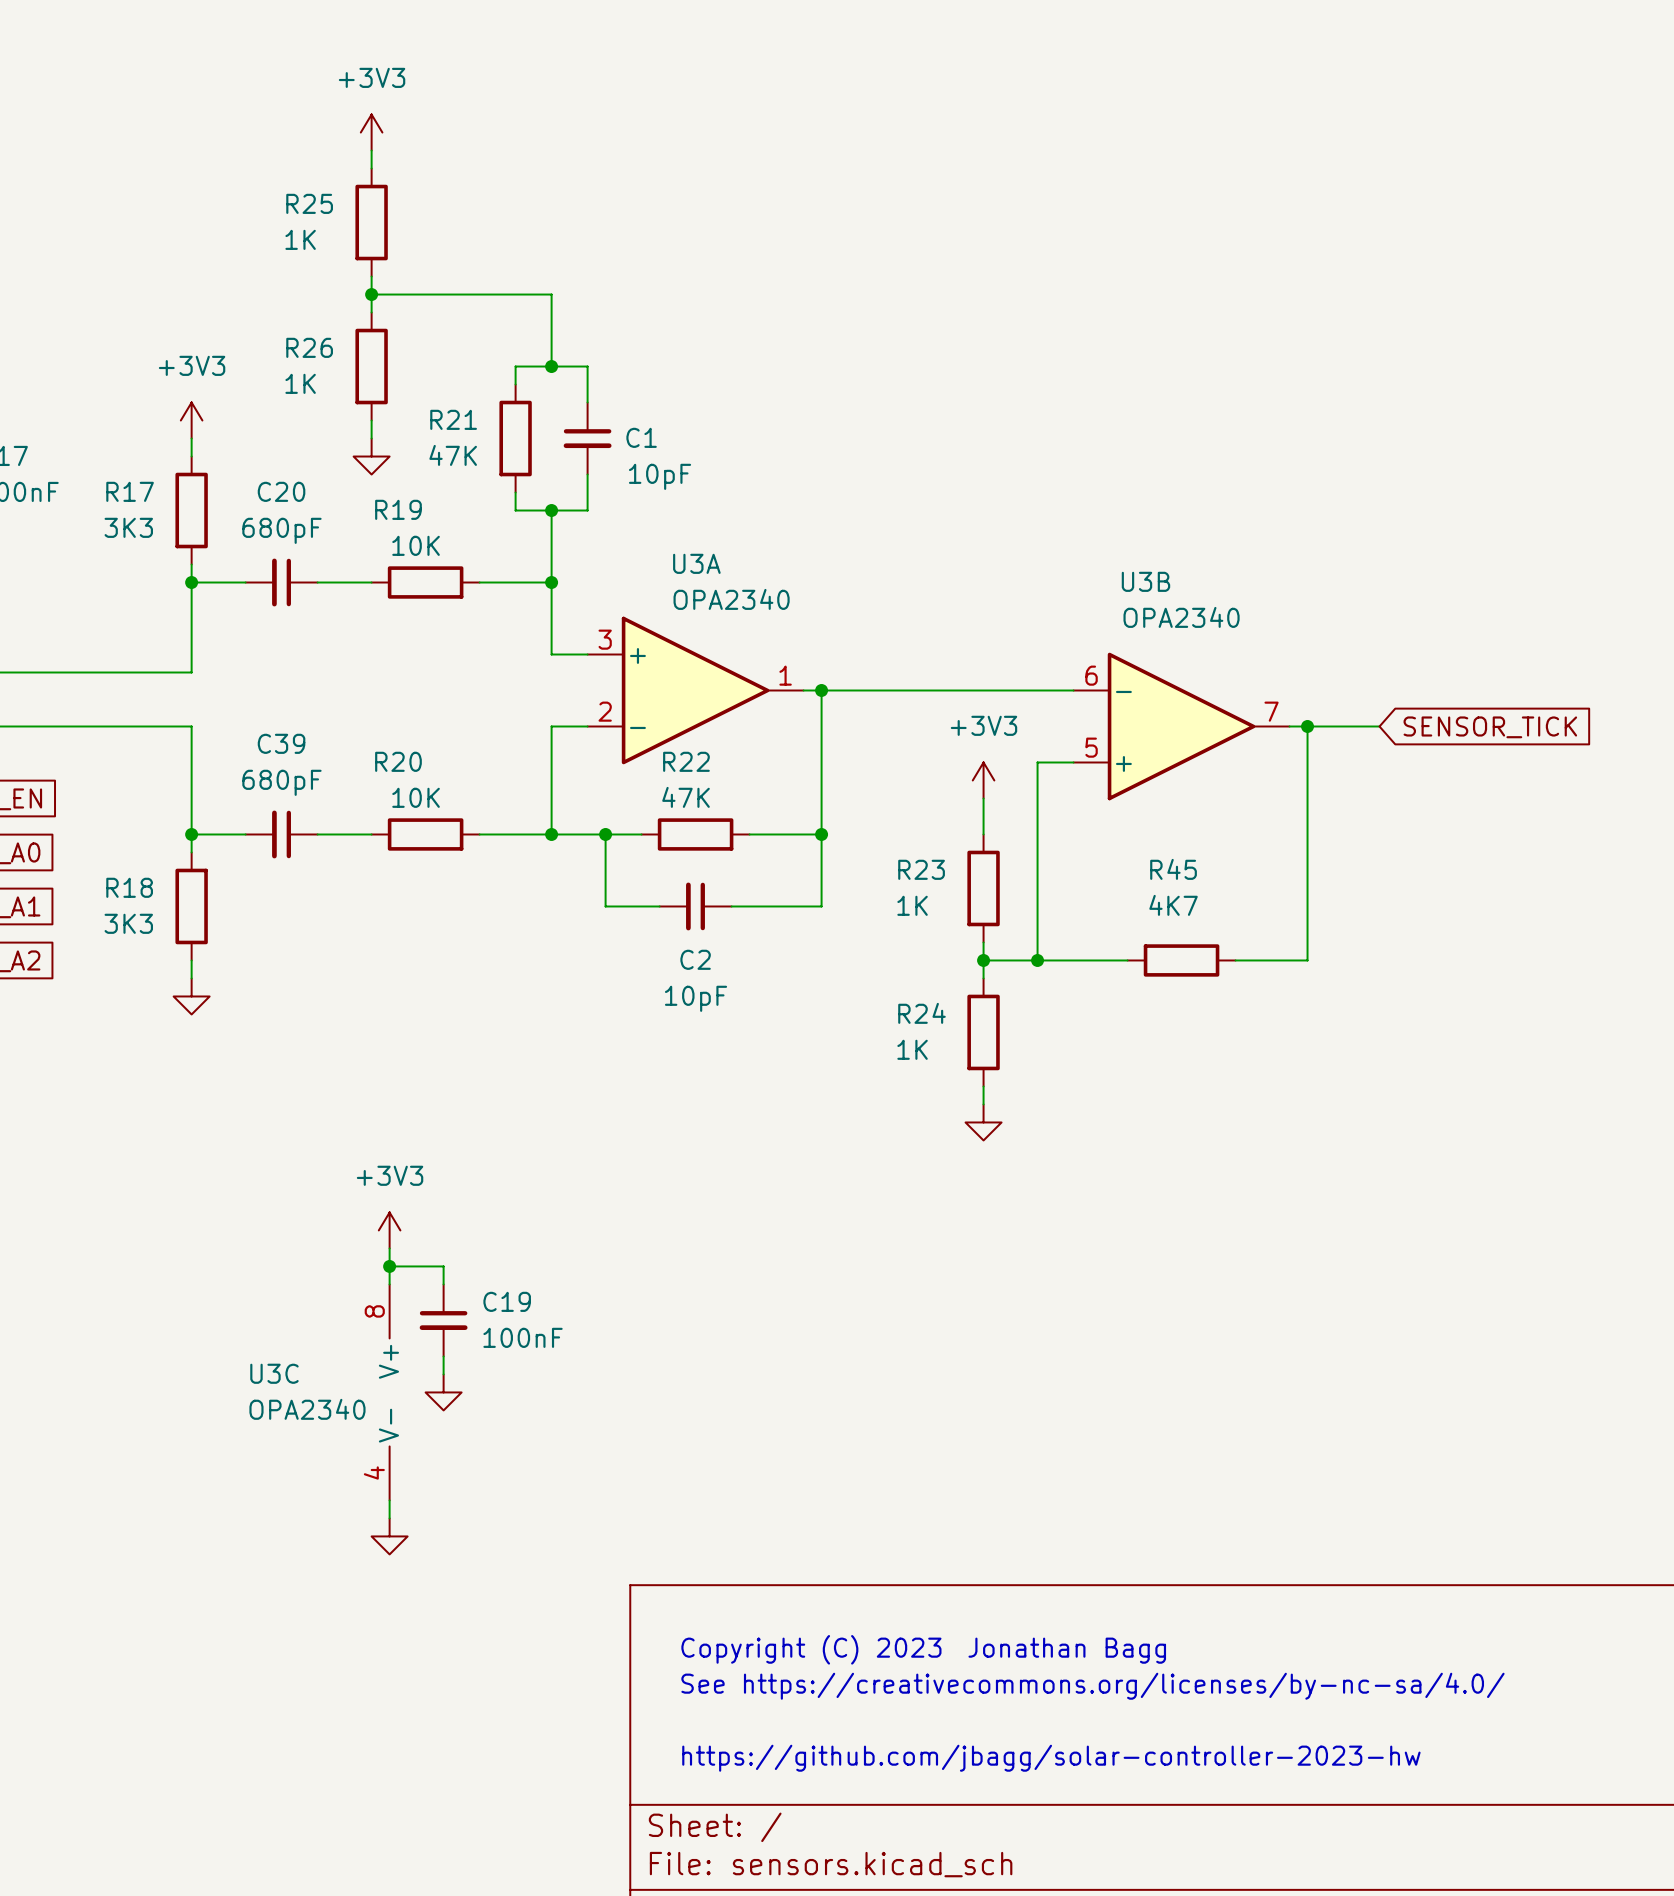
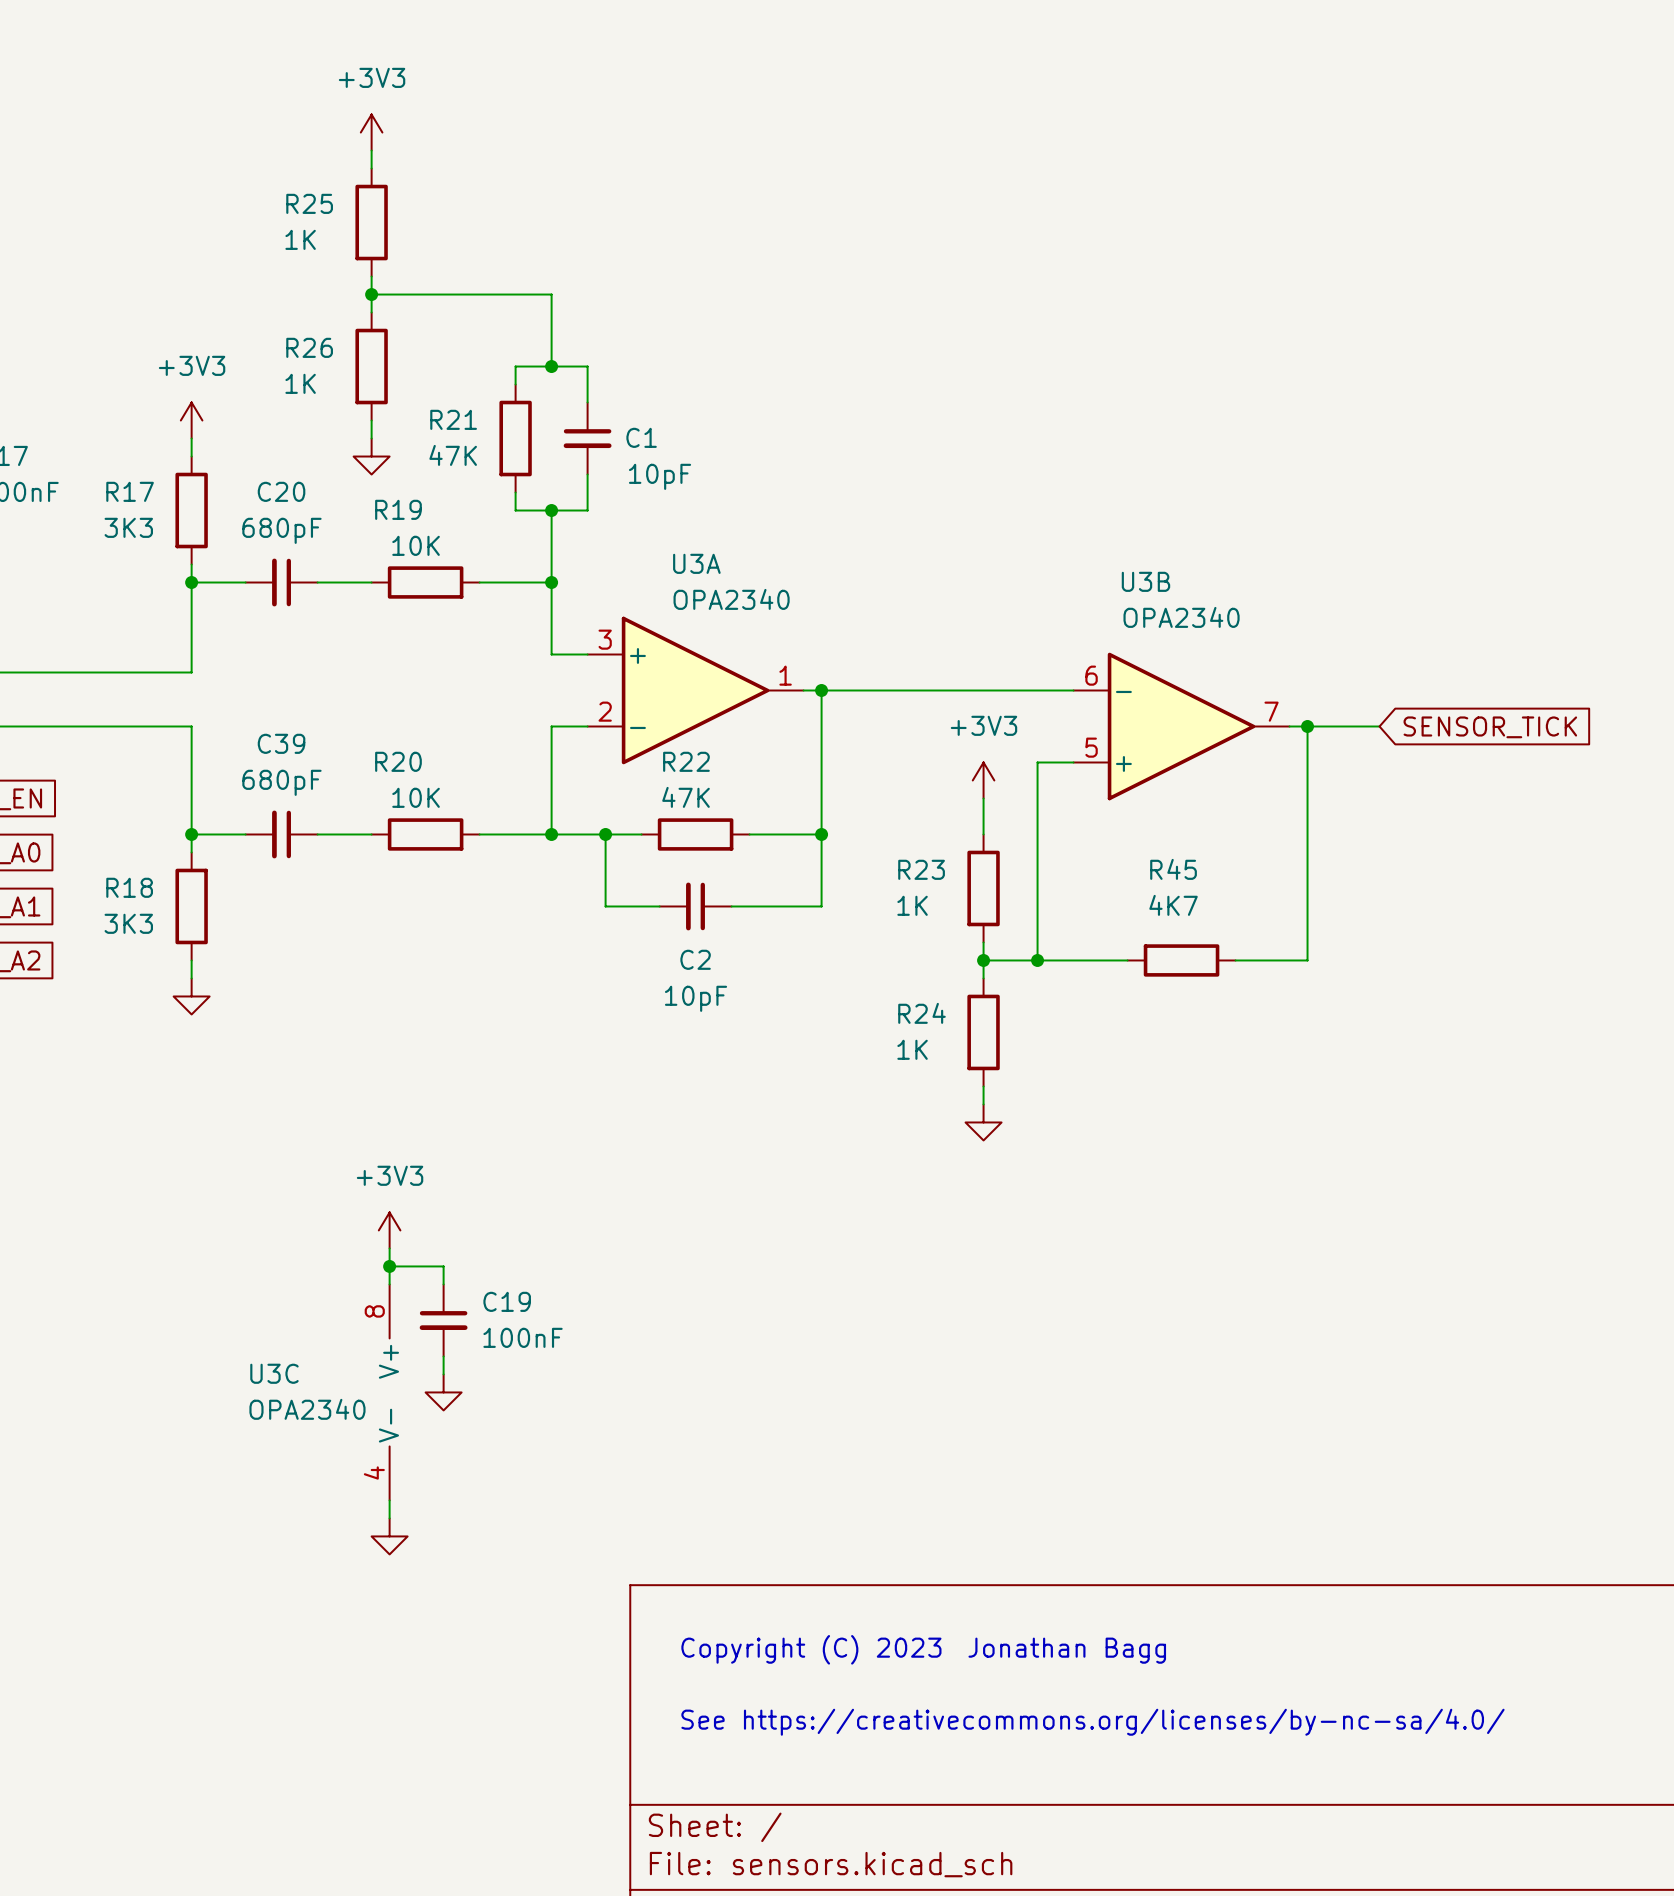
text position: See https://creativecommons.org/licenses/by-nc-sa/4.0/ (1092, 1686) -> See https://creativecommons.org/licenses/by-nc-sa/4.0/ (1092, 1722)
text: https://github.com/jbagg/solar-controller-2023-hw (1051, 1758) -> none

